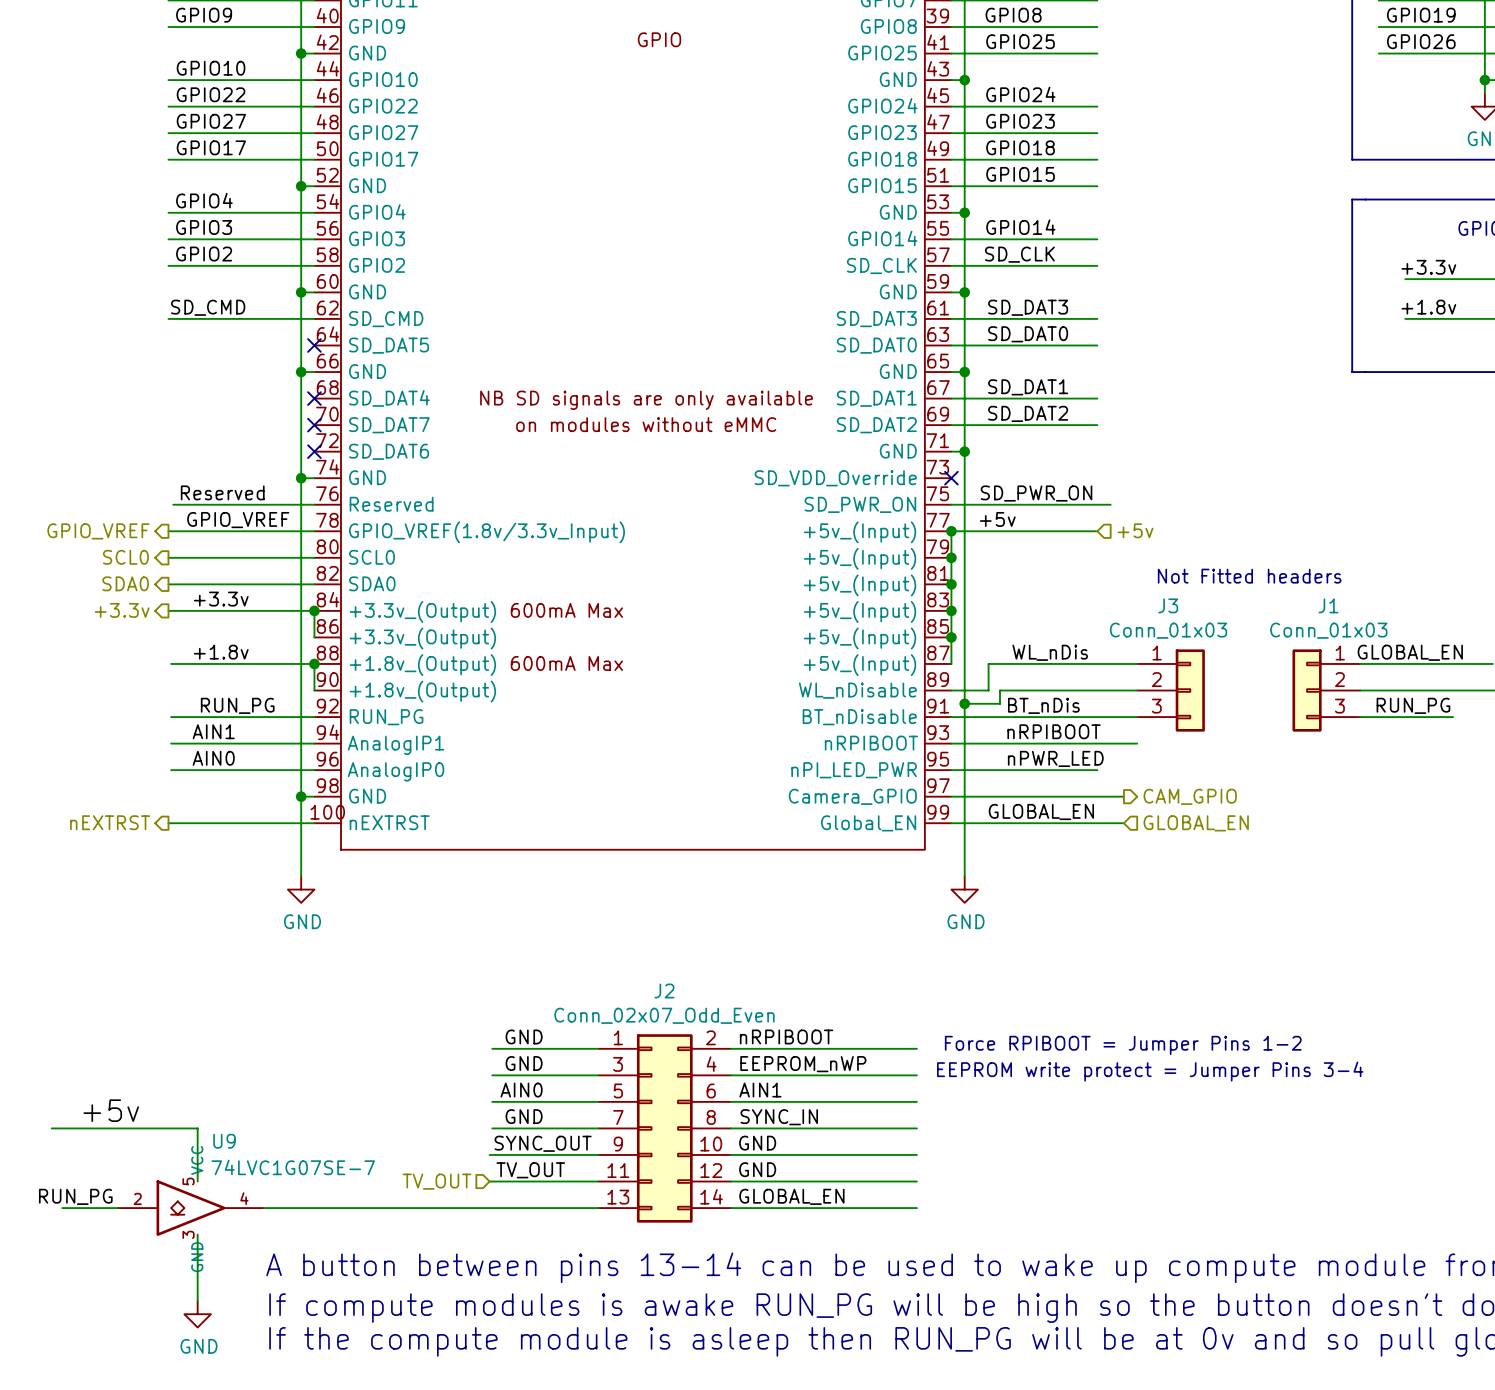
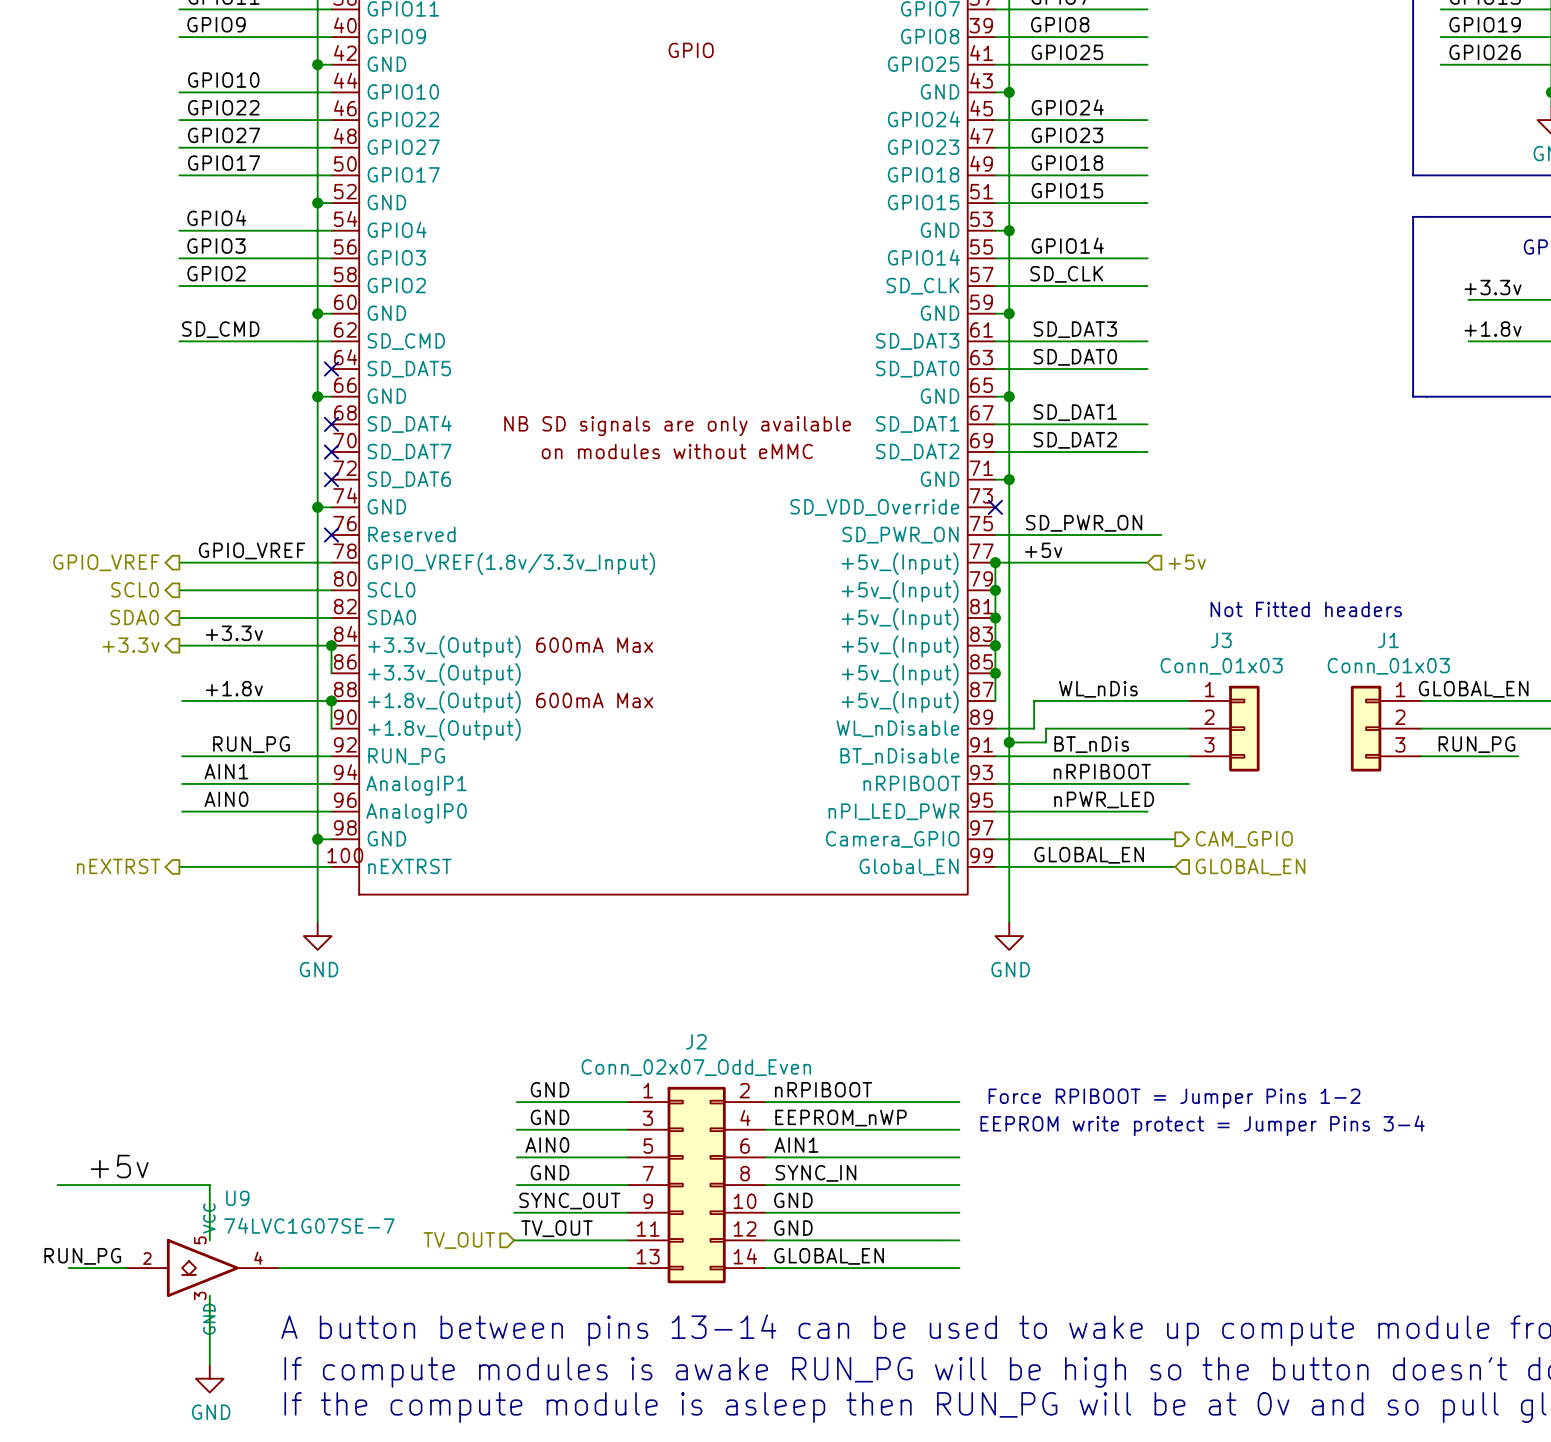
label: Reserved (222, 492) -> none
wire: (173, 504) (314, 504) -> none
no-connect mark: none -> (331, 535)

